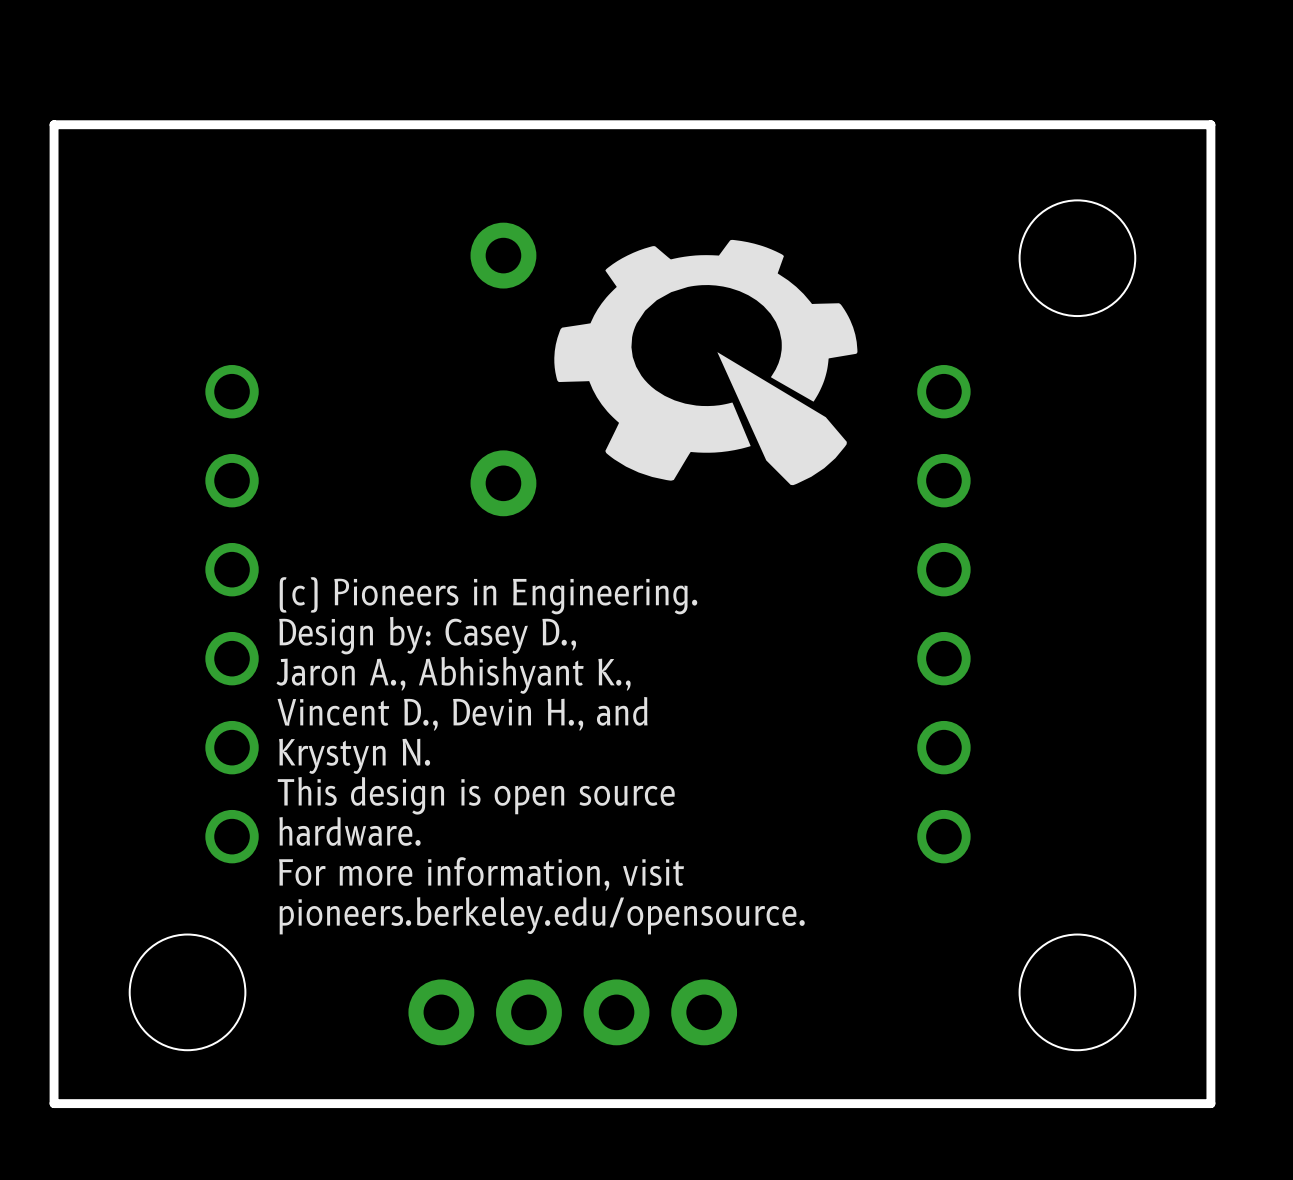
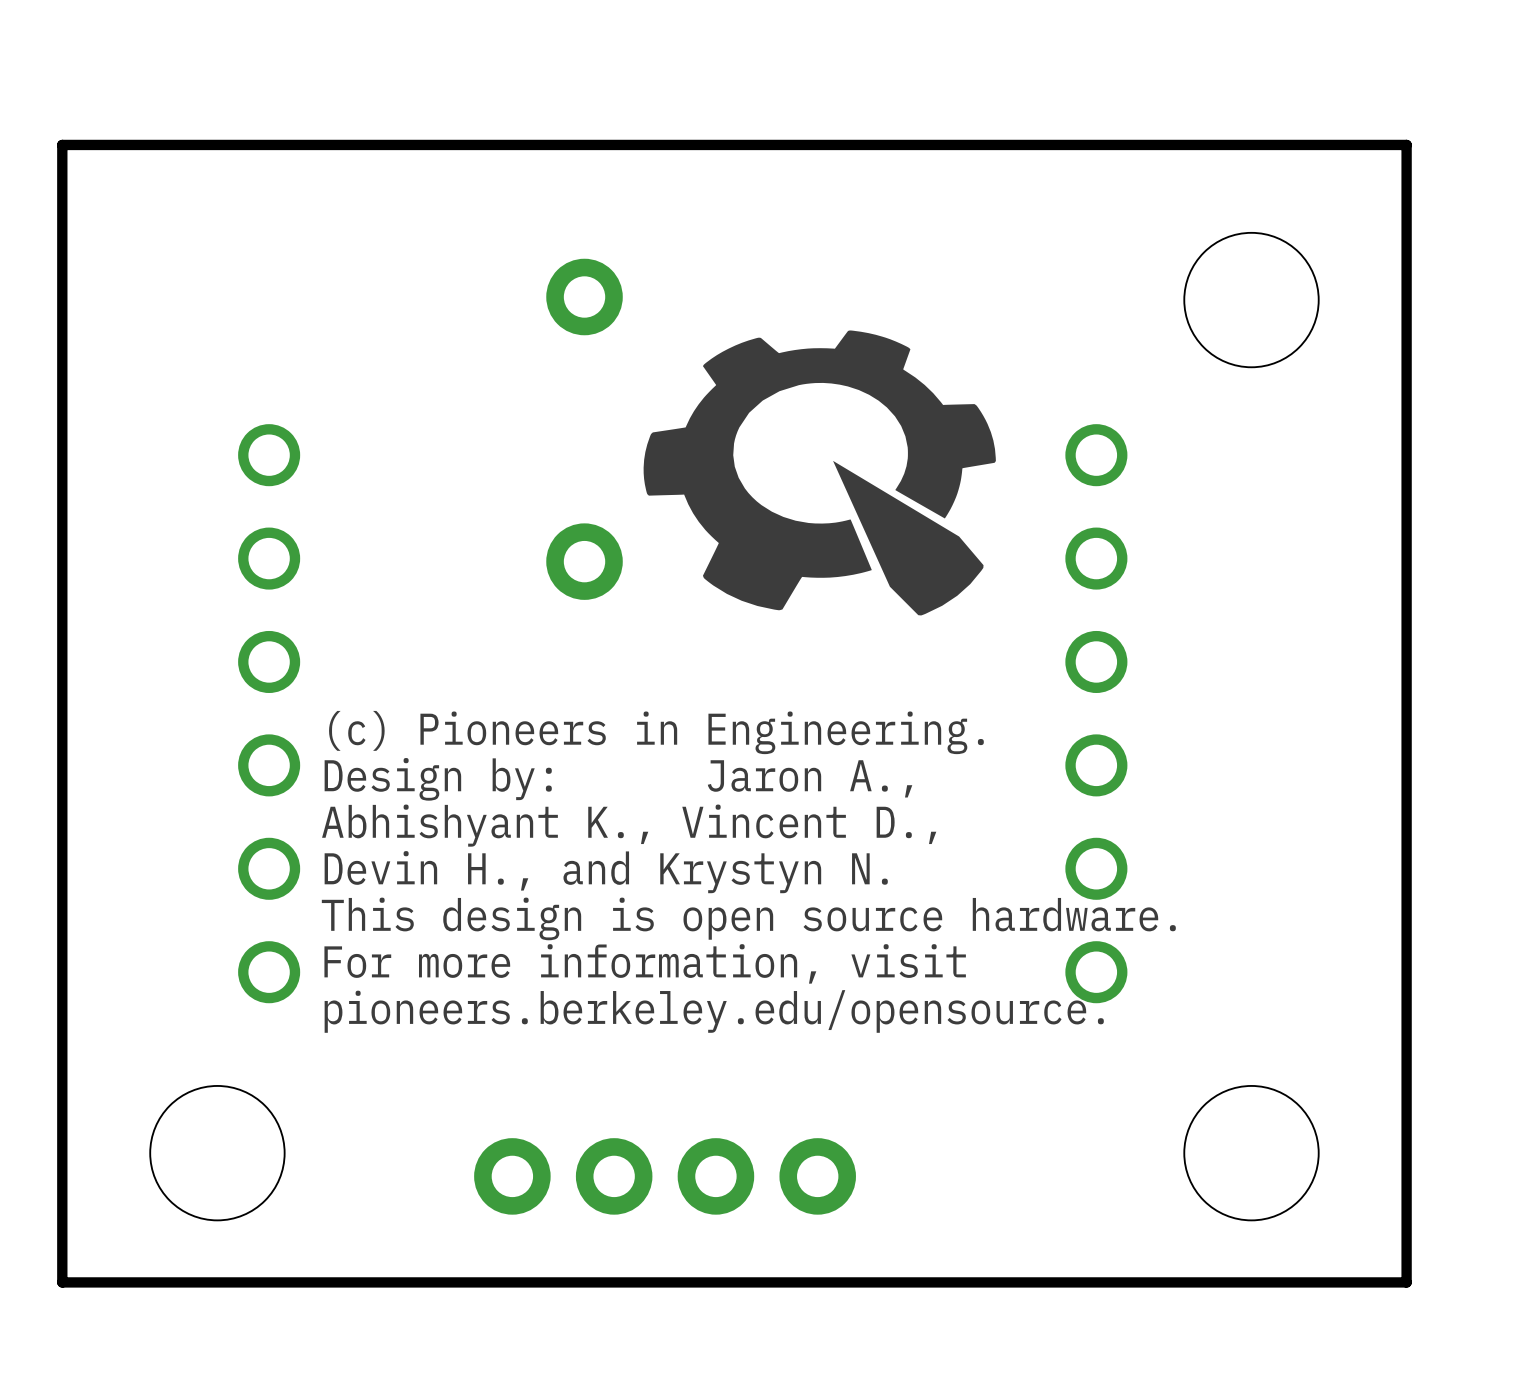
drawing position: (705, 362) -> (819, 472)
text: (c) Pioneers in Engineering. (488, 595) -> none
text: Design by: Casey D., (427, 635) -> (c) Pioneers in Engineering. (656, 732)
text: Jaron A., Abhishyant K., (453, 675) -> Design by: Jaron A., (618, 779)
text: Vincent D., Devin H., and (462, 713) -> Abhishyant K., Vincent D., (629, 825)
text: Krystyn N. (354, 756) -> Devin H., and Krystyn N. (606, 872)
text: This design is open source (476, 795) -> This design is open source hardware. (748, 918)
text: hardware. (349, 831) -> For more information, visit (645, 963)
text: For more information, visit (481, 874) -> pioneers.berkeley.edu/opensource. (714, 1011)
text: pioneers.berkeley.edu/opensource. (542, 915) -> none

